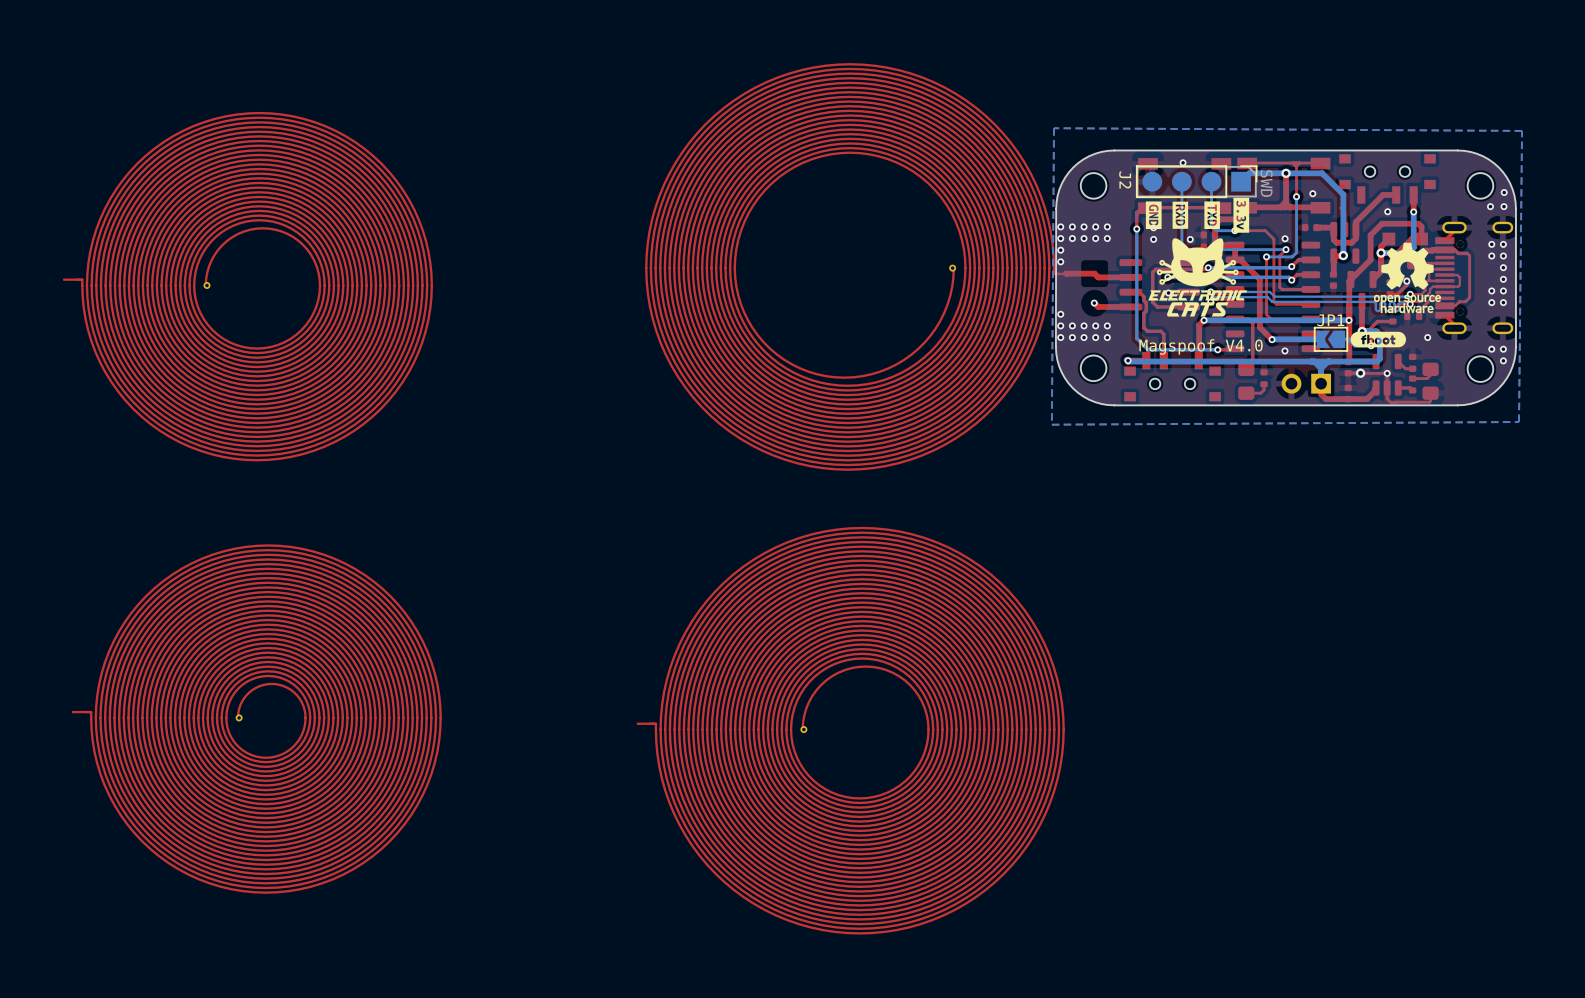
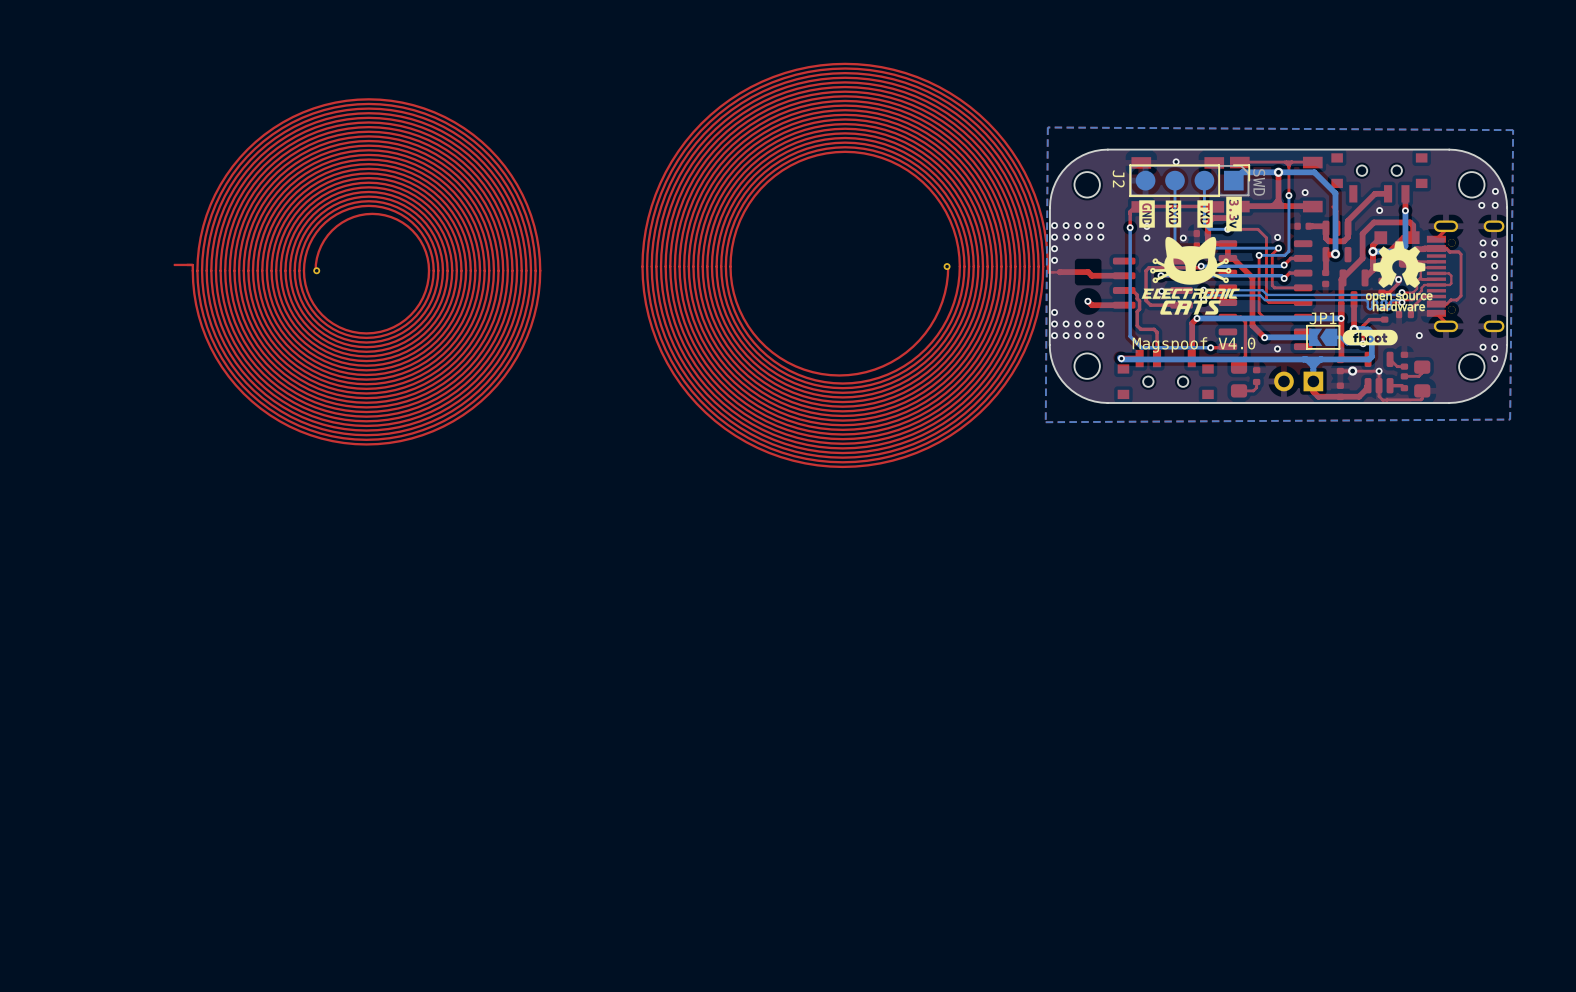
part position: (248, 286) -> (357, 271)
part: (256, 719) -> none
part: (850, 730) -> none

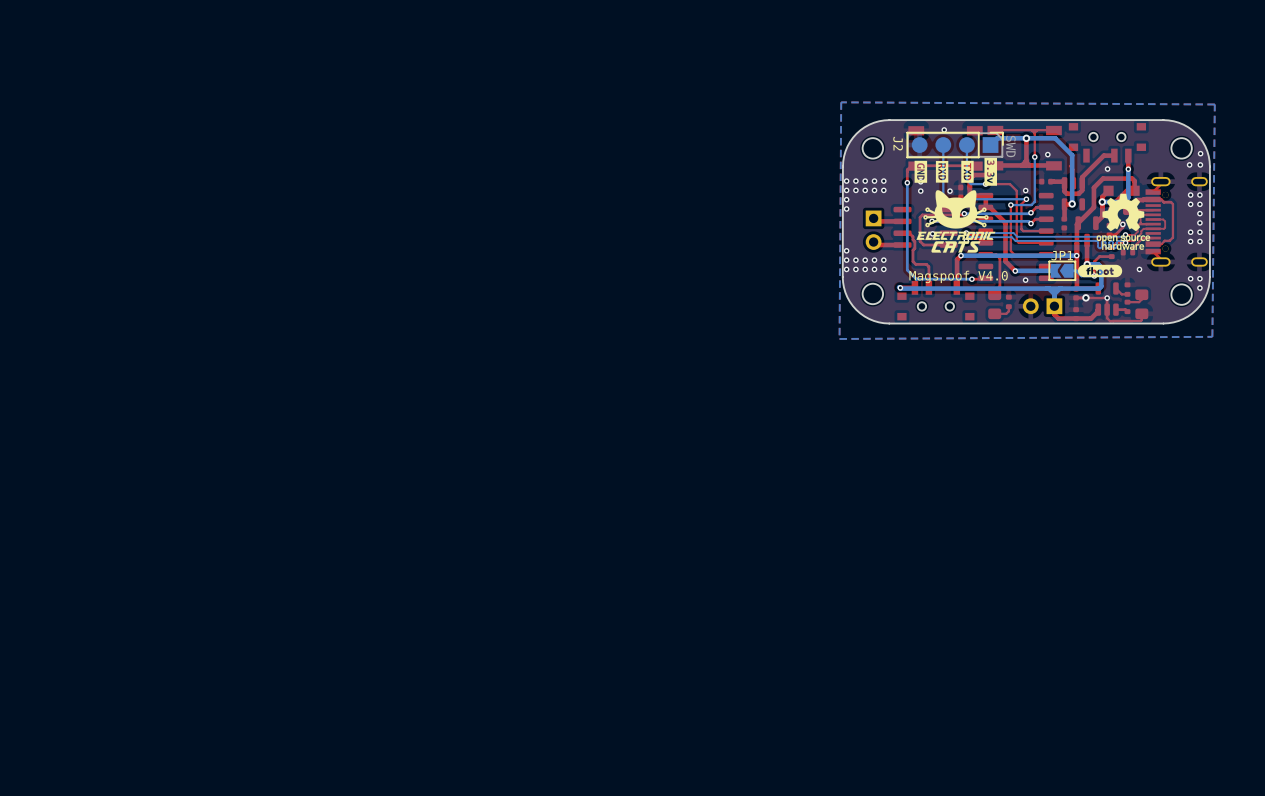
part: (854, 265) -> none
part: (357, 271) -> none
top track: (1088, 272) (1059, 272) -> none
part: none -> (873, 230)
via: (1087, 301) -> none

